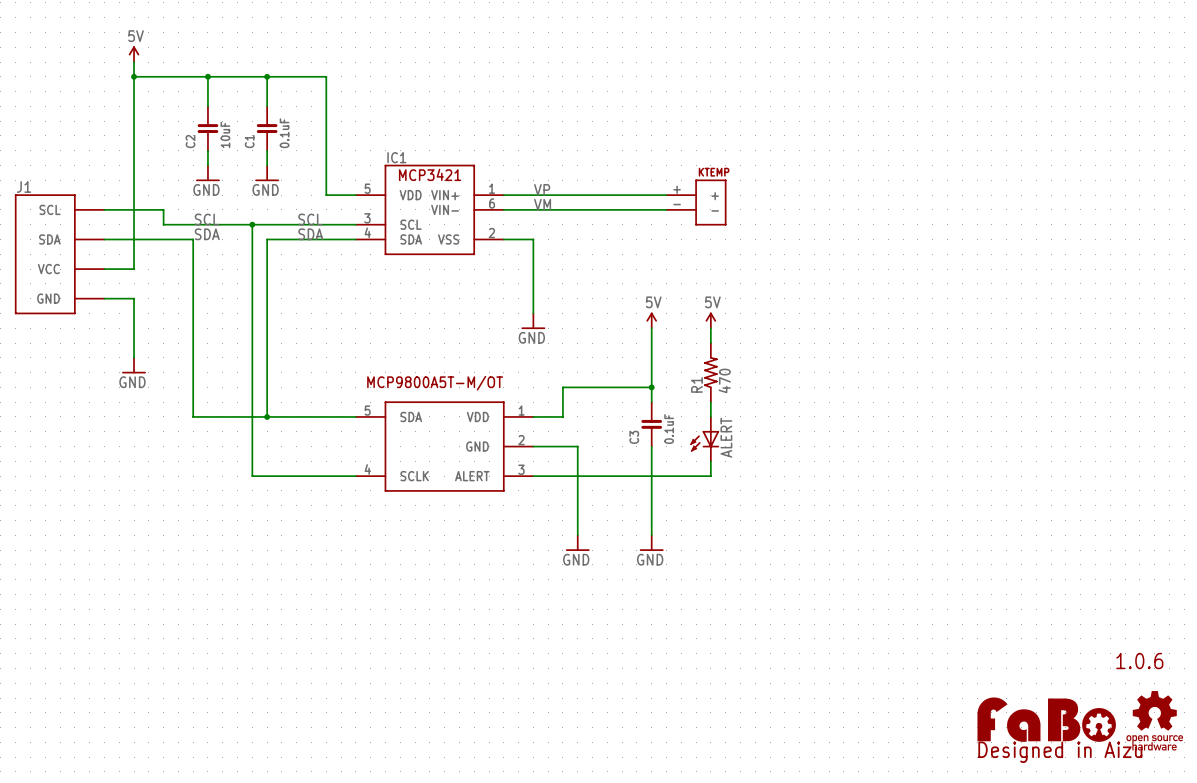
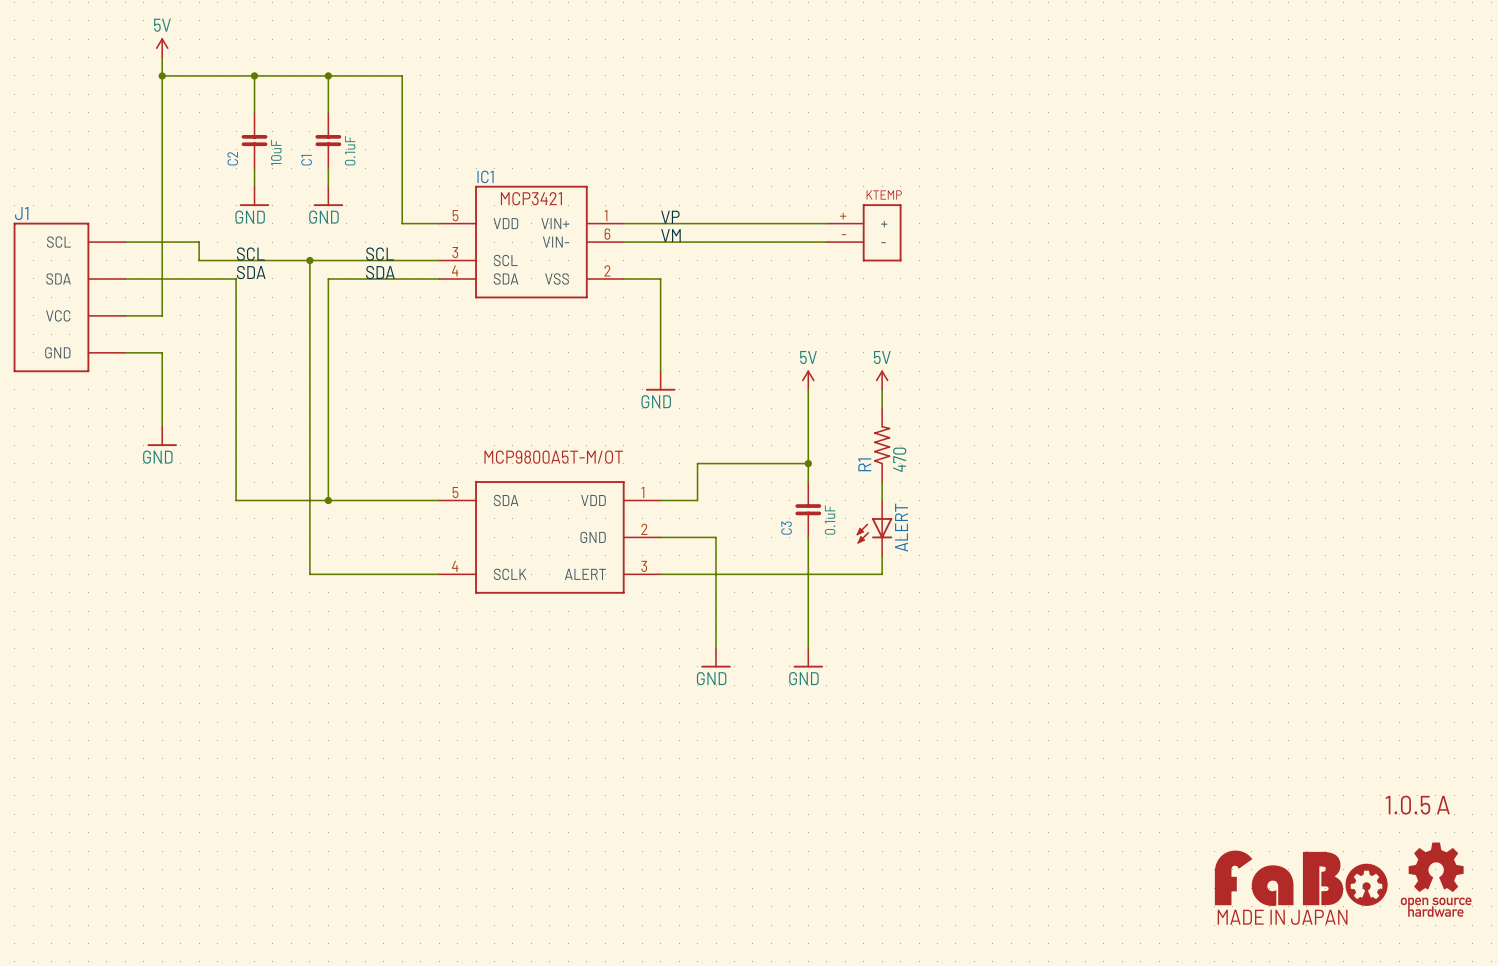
text: 1.0.6 (1139, 661) -> 1.0.5 A (1417, 805)
part text: none -> MADE IN JAPAN (1282, 917)
part text: Designed in Aizu (1060, 752) -> none

